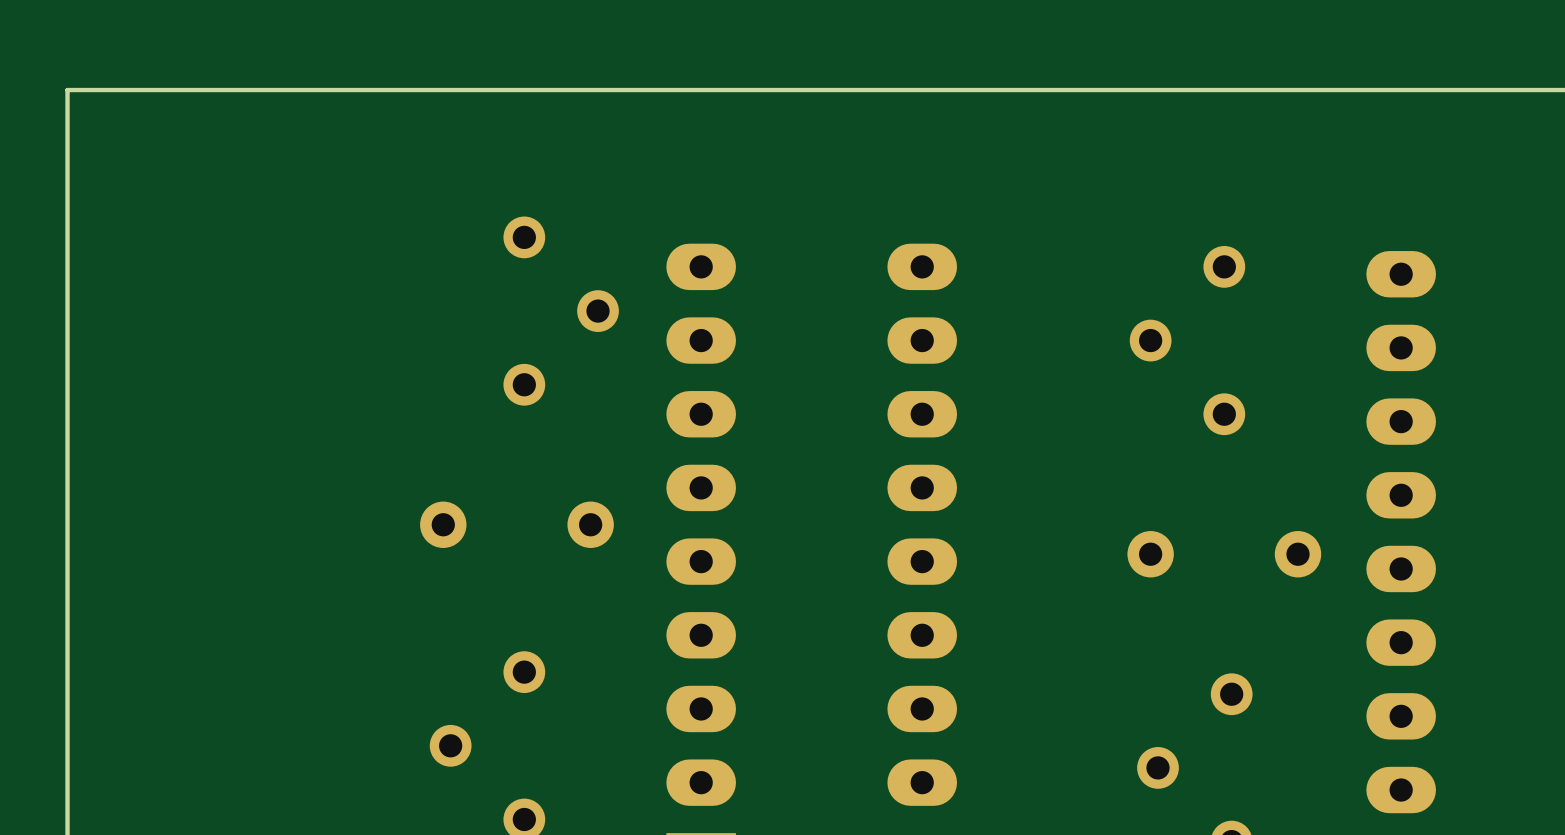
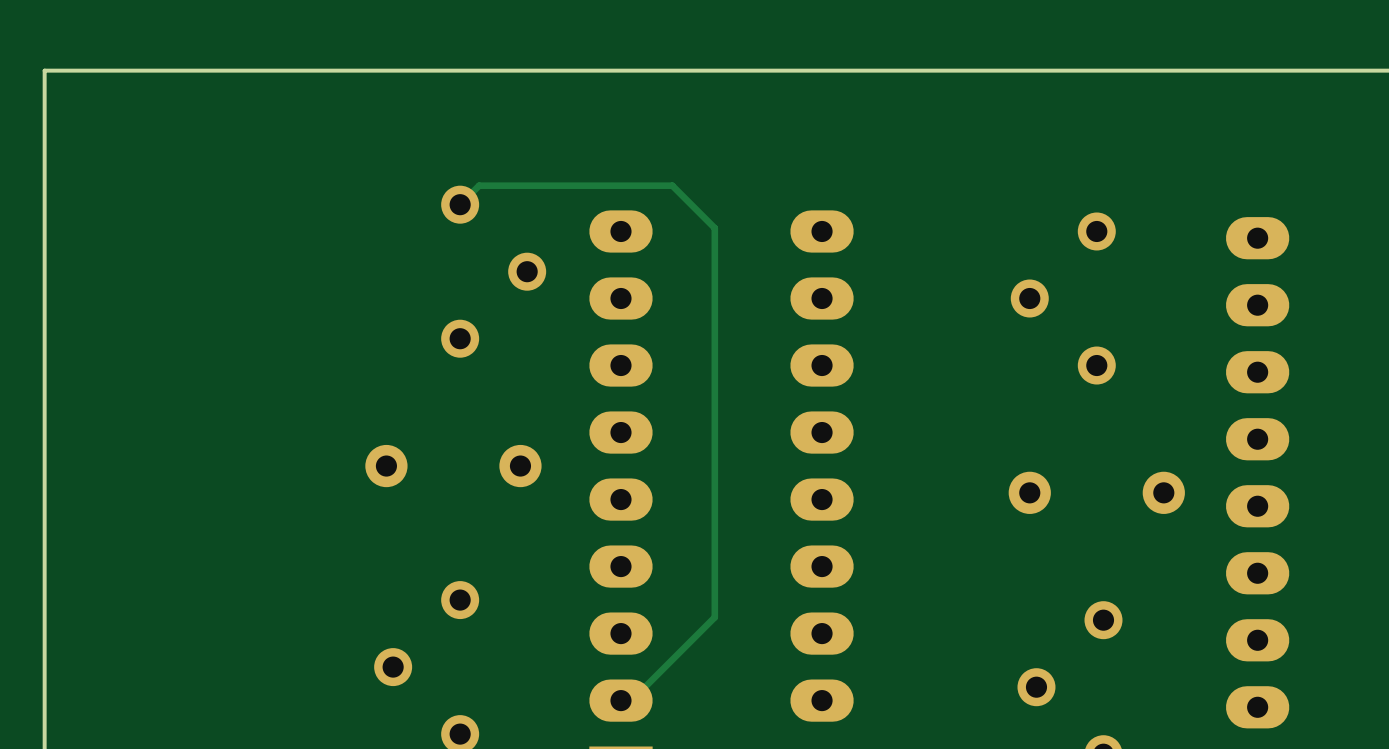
track: none -> (460, 204) (479, 185) (672, 185) (714, 228) (714, 617) (631, 700) (620, 700)

